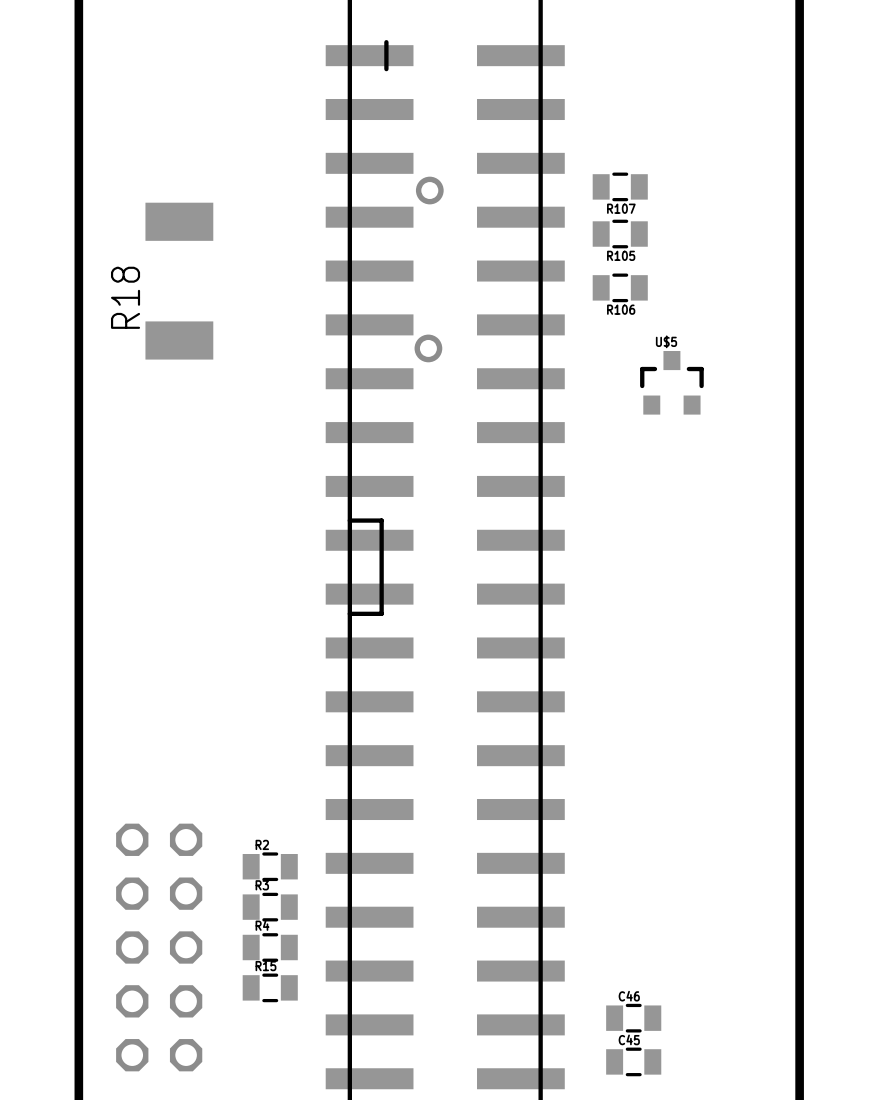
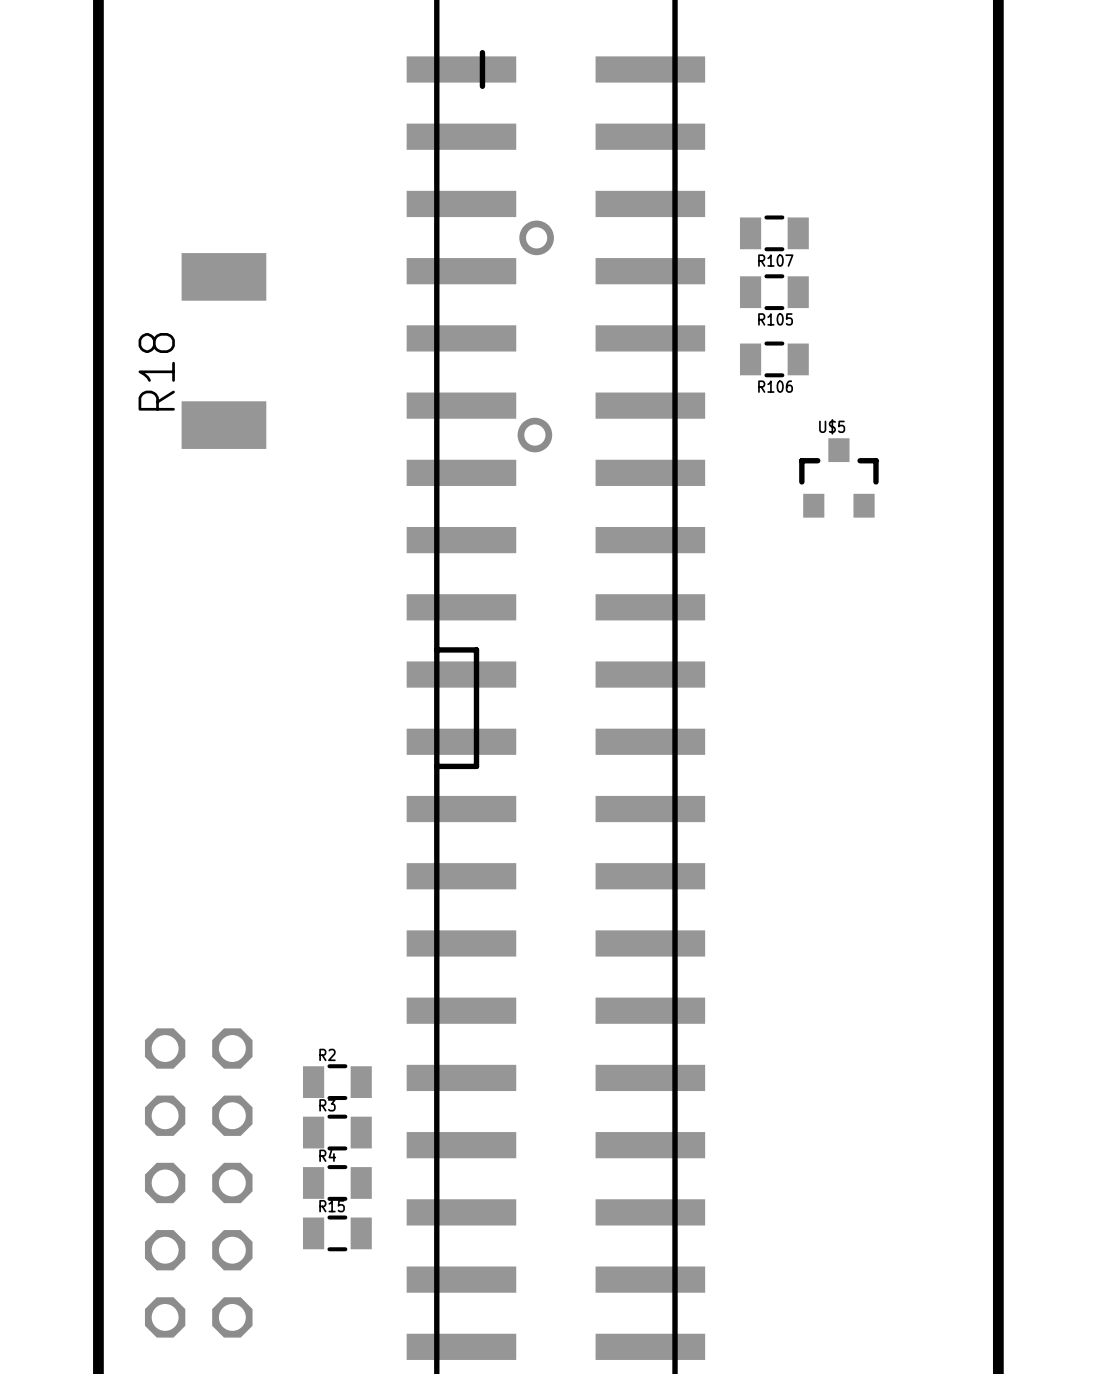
C46: (633, 1018) -> none
C45: (633, 1061) -> none

